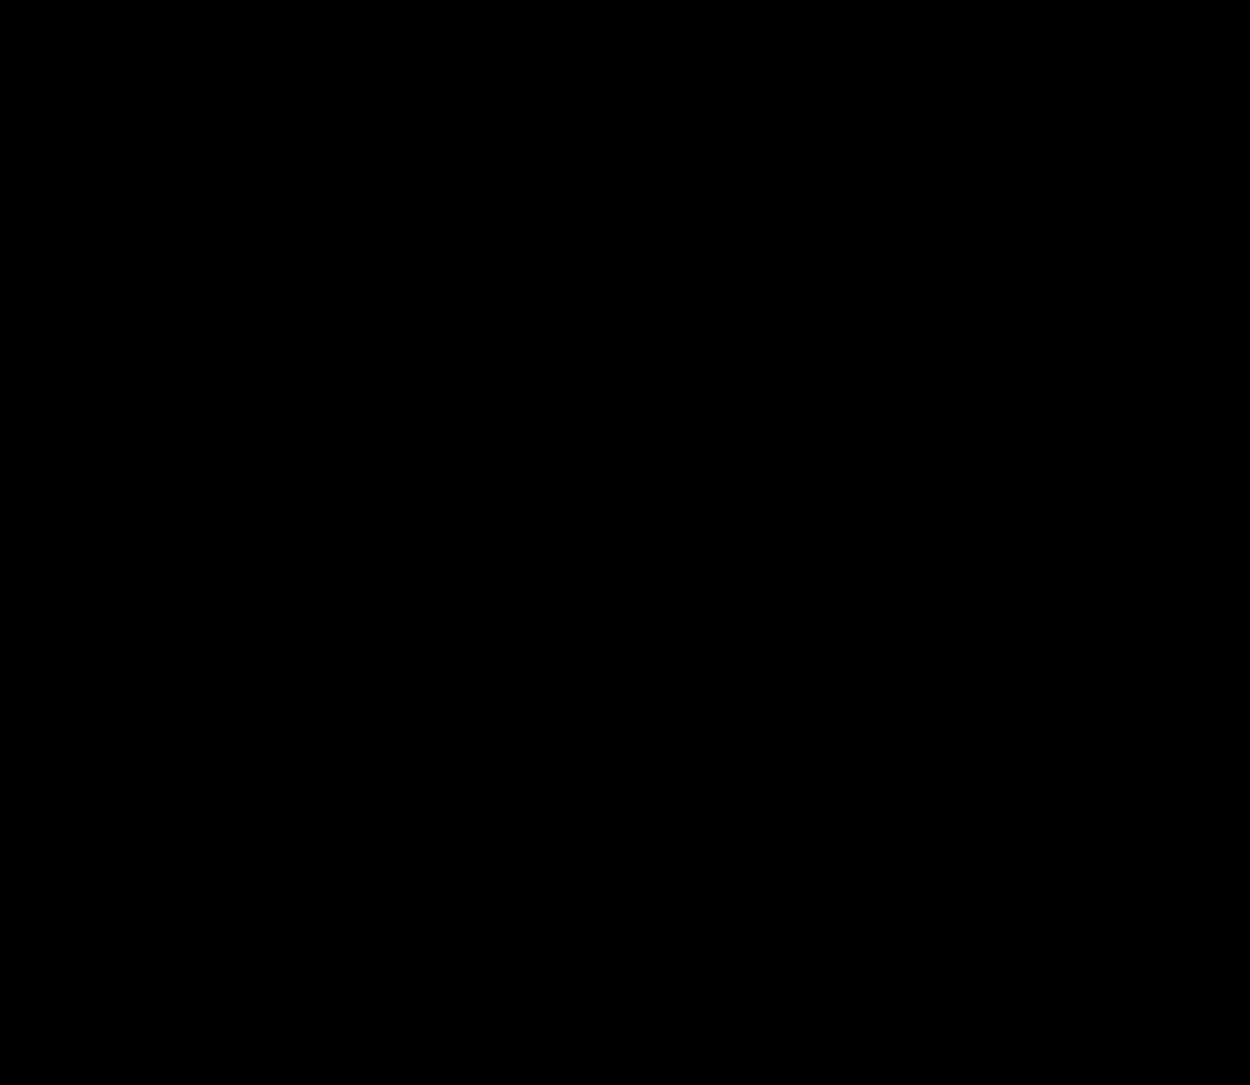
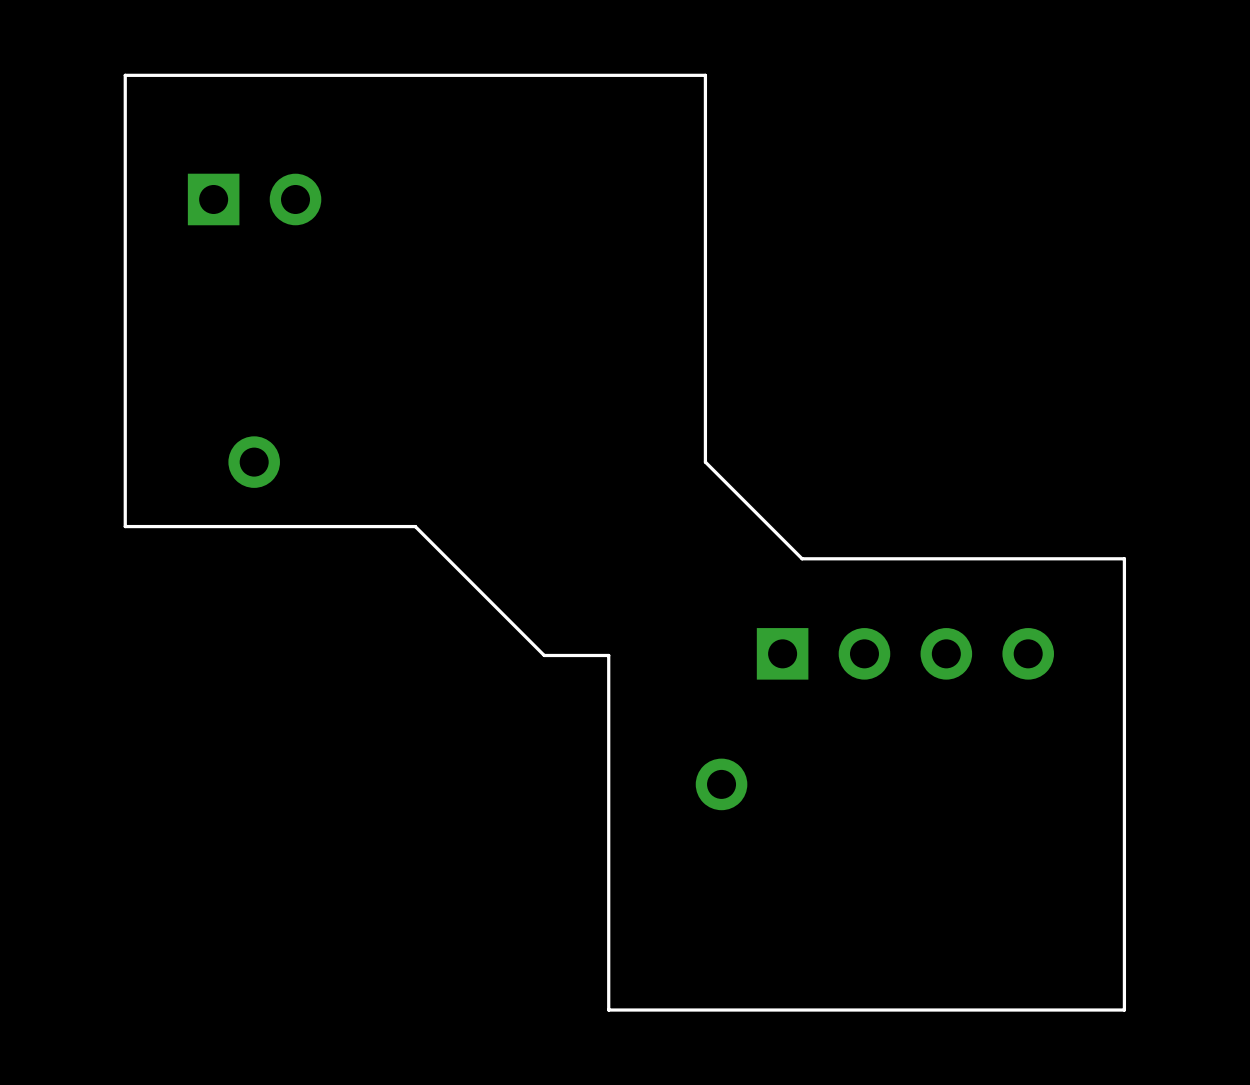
board edge: none -> (705, 75) (705, 462) (802, 558) (1124, 558) (1124, 1010) (608, 1010) (608, 655) (544, 655) (415, 526) (125, 526) (125, 75) (705, 75)
part: none -> (254, 199)
part: none -> (254, 462)
part: none -> (905, 653)
part: none -> (721, 784)

